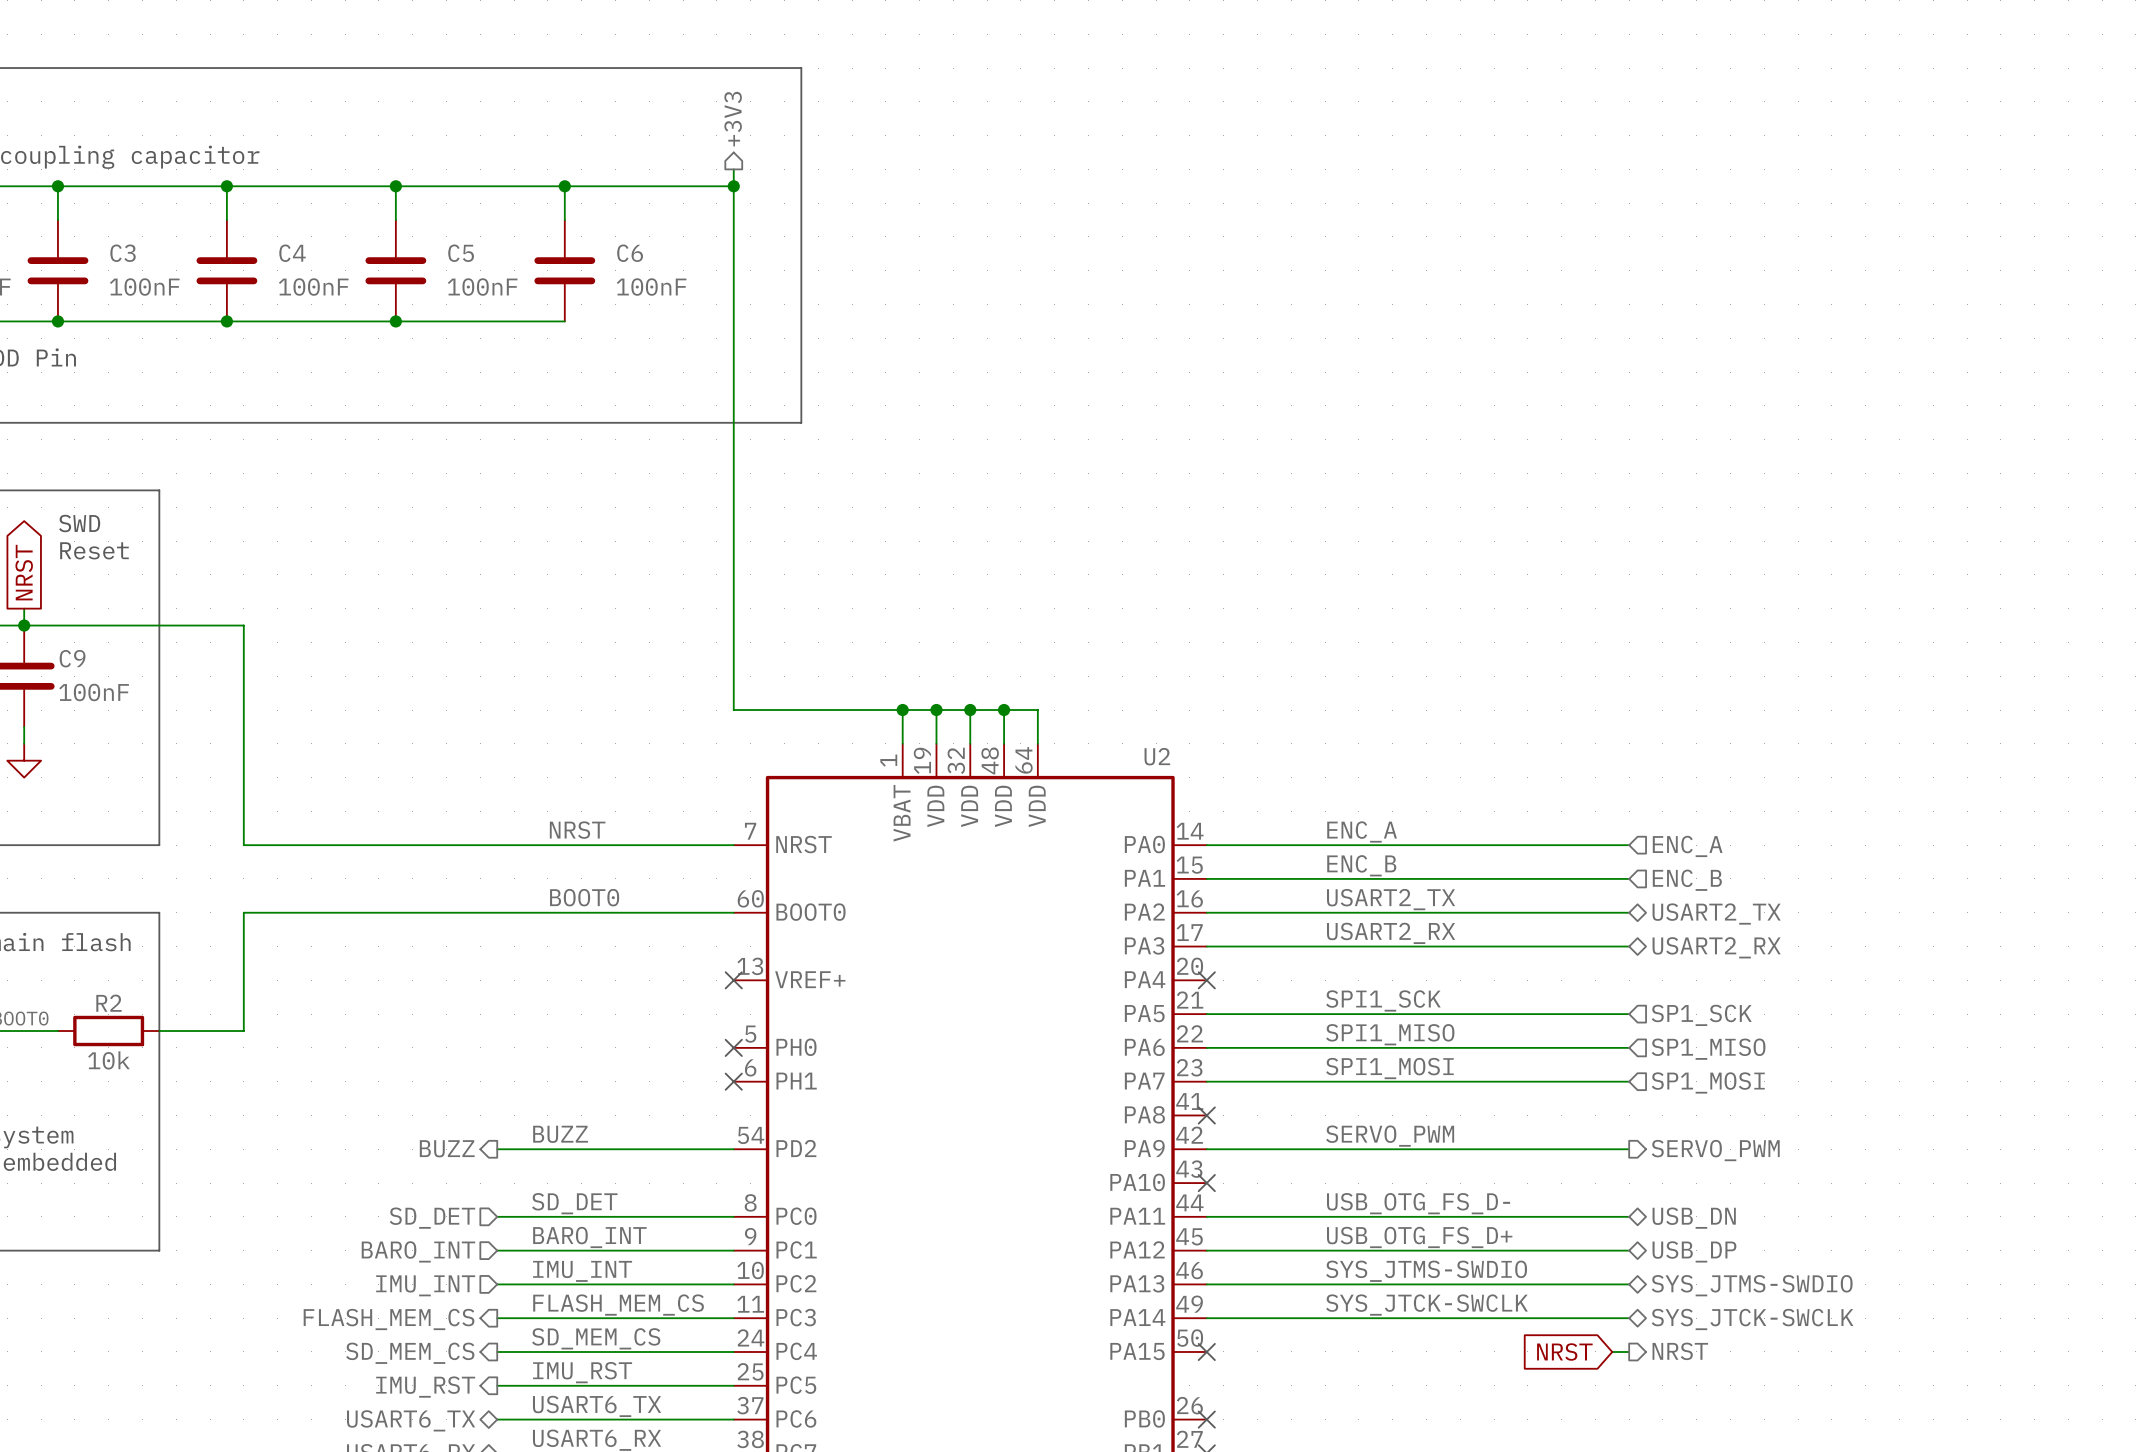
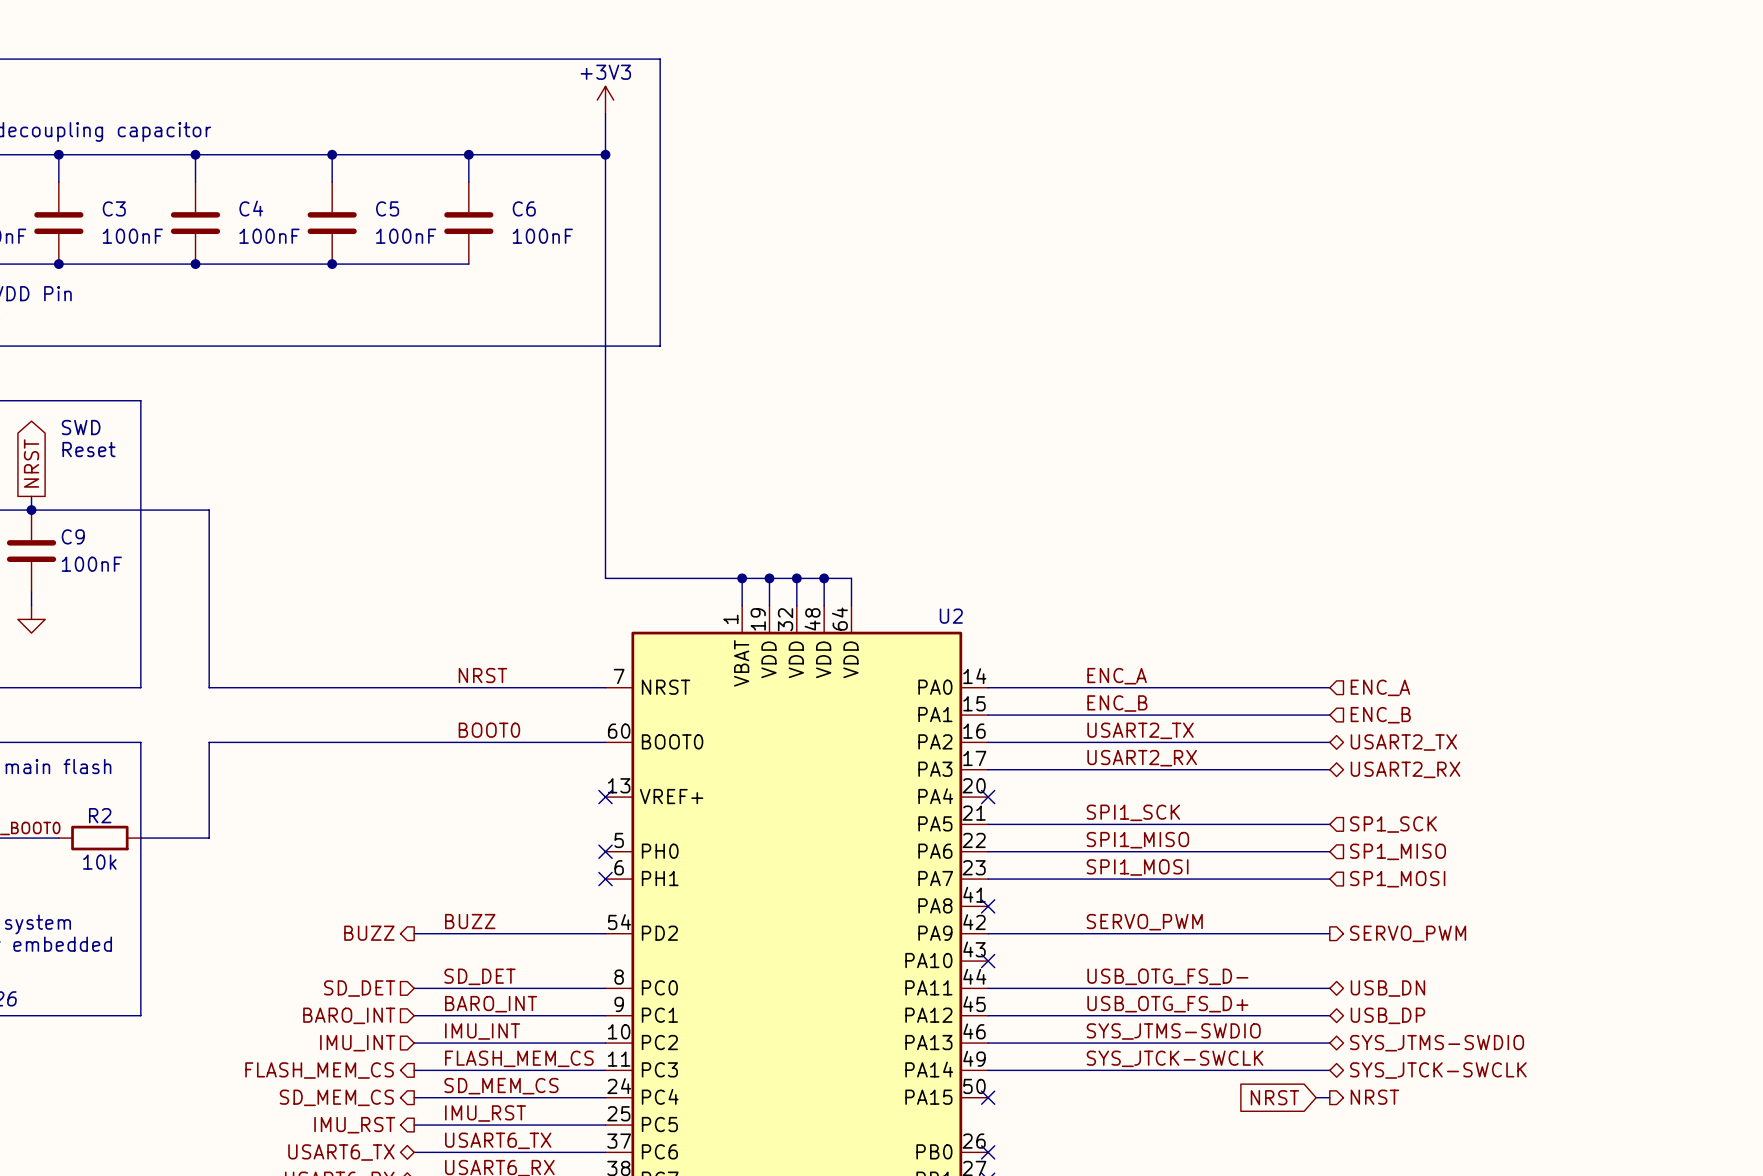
power symbol: none -> +3V3 (605, 100)
hierarchical label: +3V3 (733, 119) -> none
wire: none -> (605, 113) (605, 141)

